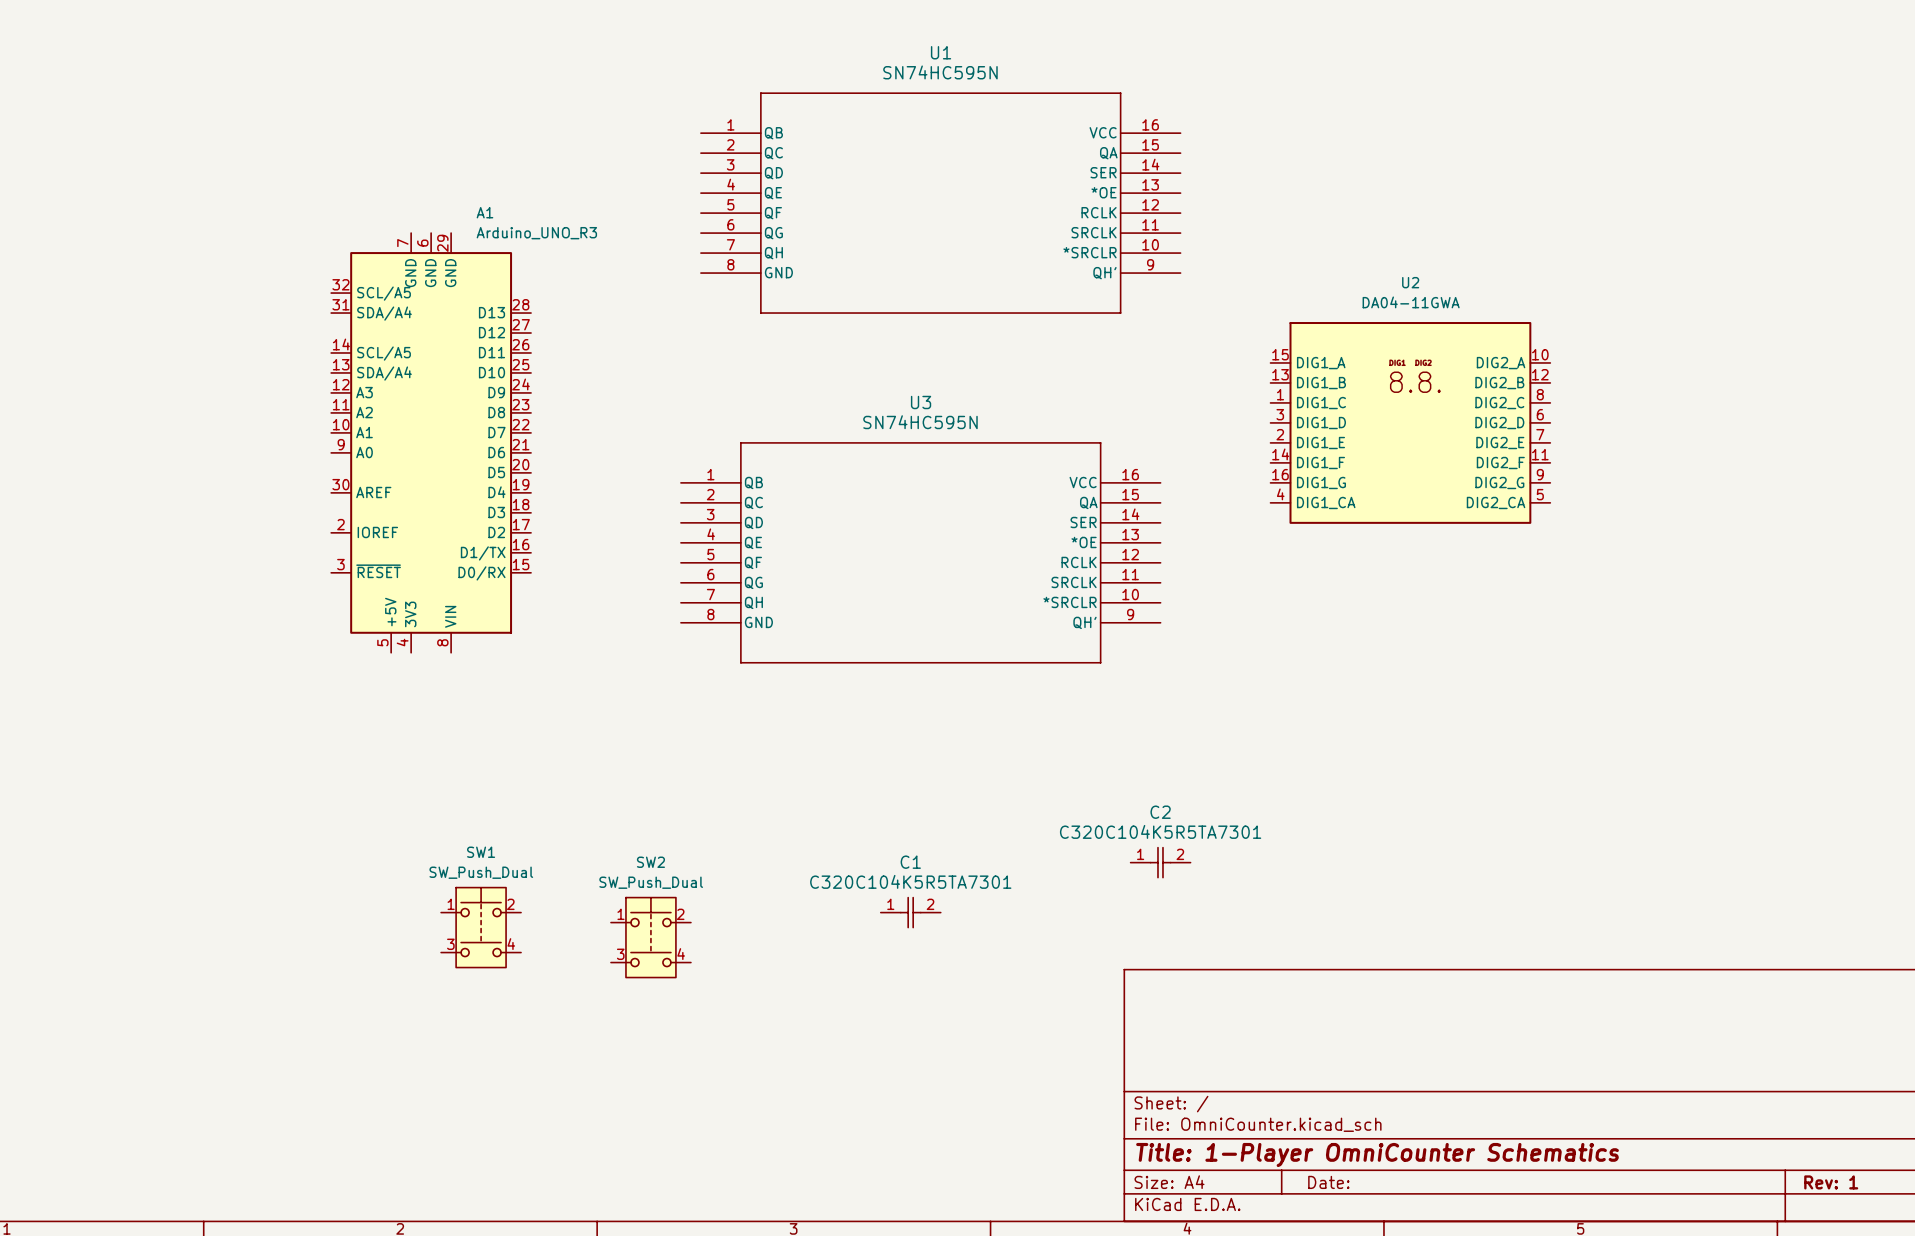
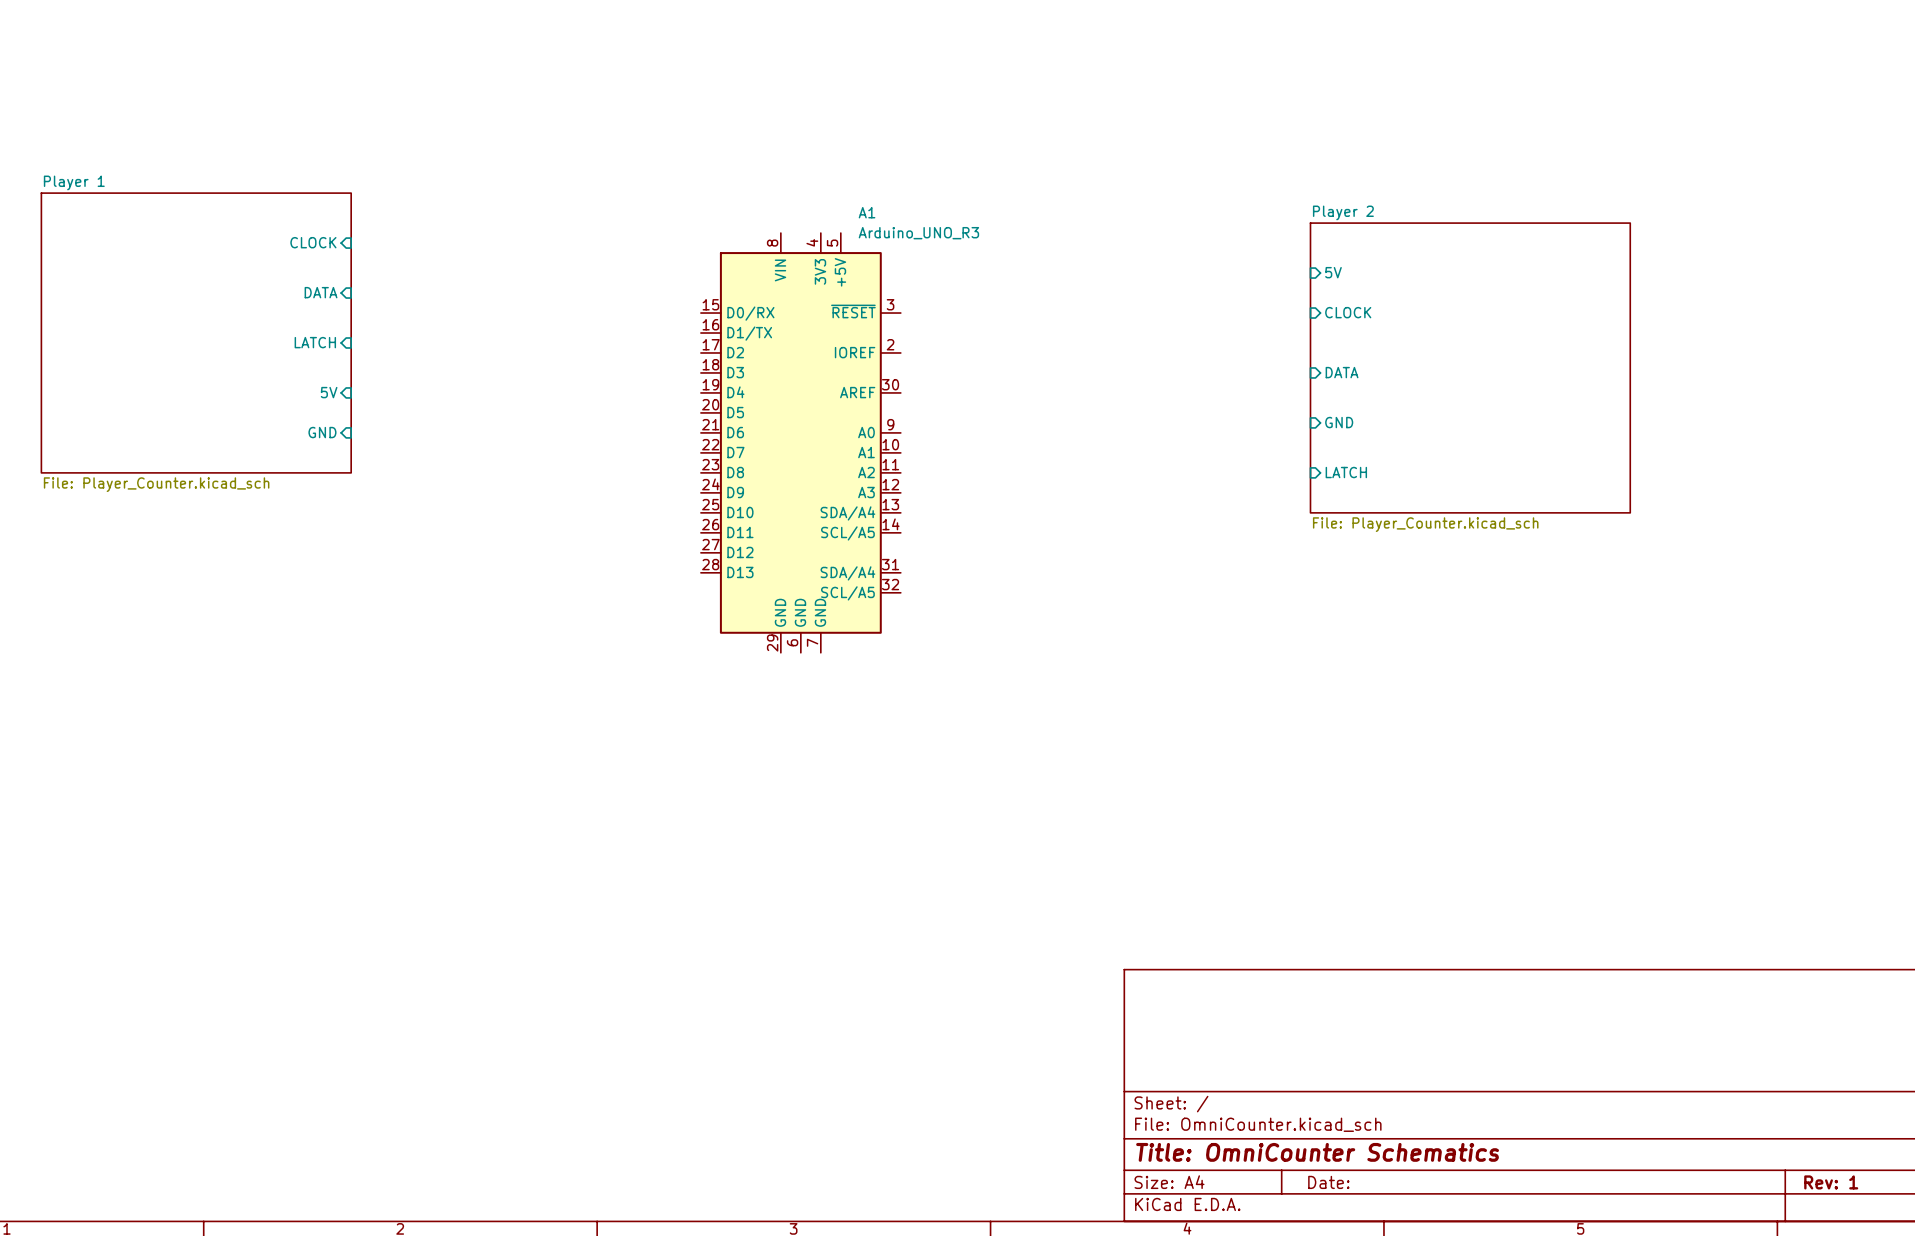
U1: SN74HC595N (940, 203) -> none
sheet pin: none -> CLOCK (313, 242)
sheet pin: none -> 5V (1333, 272)
sheet pin: none -> DATA (321, 292)
sheet pin: none -> CLOCK (1348, 312)
sheet Player 1: none -> File: Player_Counter.kicad_sch (196, 333)
sheet pin: none -> LATCH (315, 342)
sheet Player 2: none -> File: Player_Counter.kicad_sch (1470, 367)
sheet pin: none -> DATA (1342, 372)
sheet pin: none -> 5V (329, 392)
sheet pin: none -> GND (1339, 422)
U2: DA04-11GWA (1410, 422) -> none
sheet pin: none -> GND (322, 432)
A1 rotation: 0° (431, 442) -> 180° (800, 442)
A1 position: (431, 442) -> (800, 442)
sheet pin: none -> LATCH (1346, 472)
U3: SN74HC595N (920, 552) -> none
C2: C320C104K5R5TA7301 (1160, 862) -> none
C1: C320C104K5R5TA7301 (910, 912) -> none
SW1: SW_Push_Dual (481, 927) -> none
SW2: SW_Push_Dual (650, 937) -> none
title block: Title: 1-Player OmniCounter Schematics (1377, 1155) -> Title: OmniCounter Schematics (1317, 1152)

